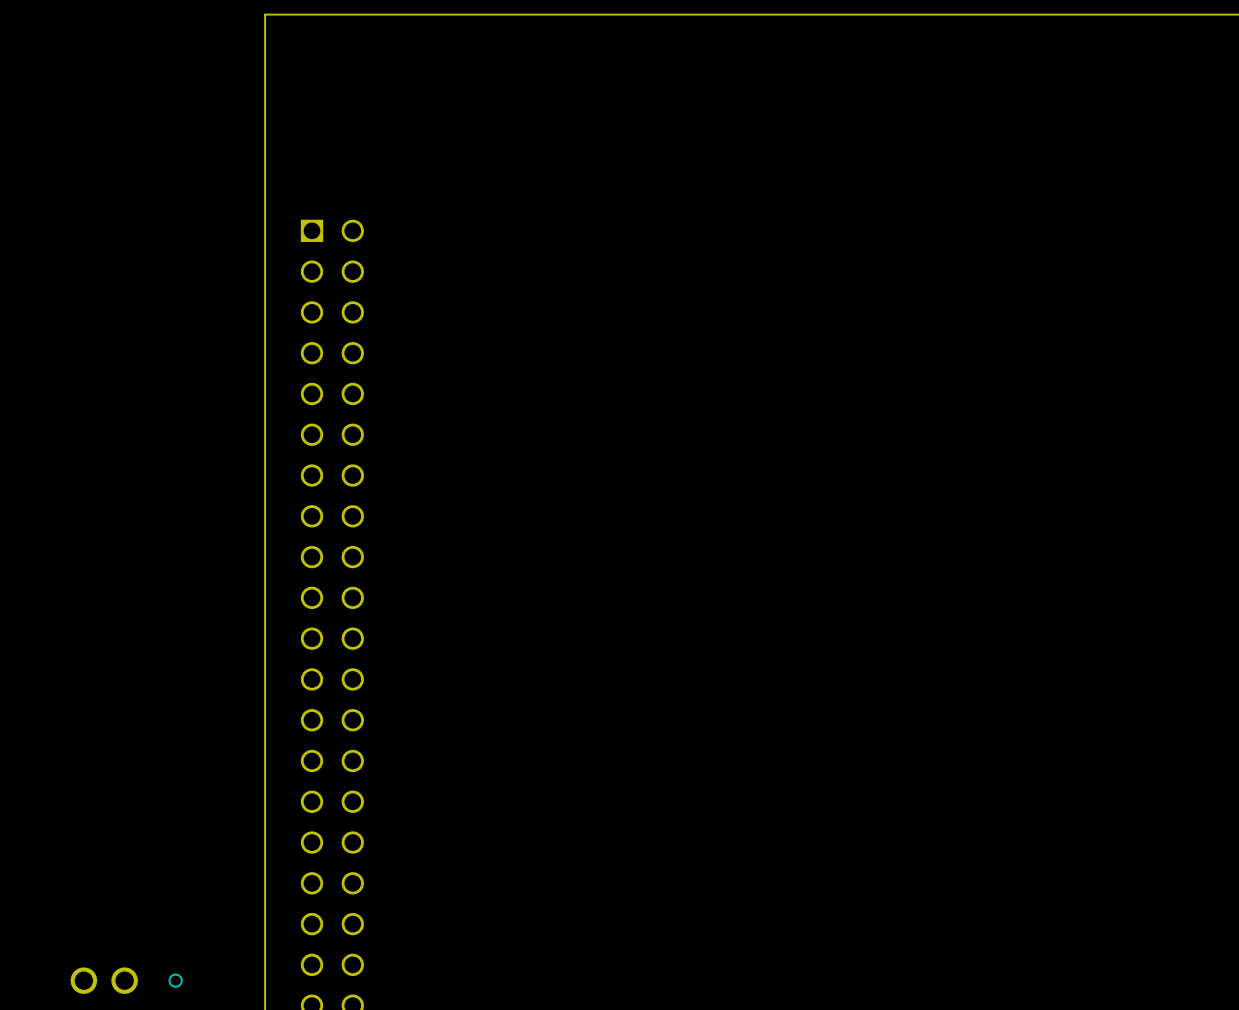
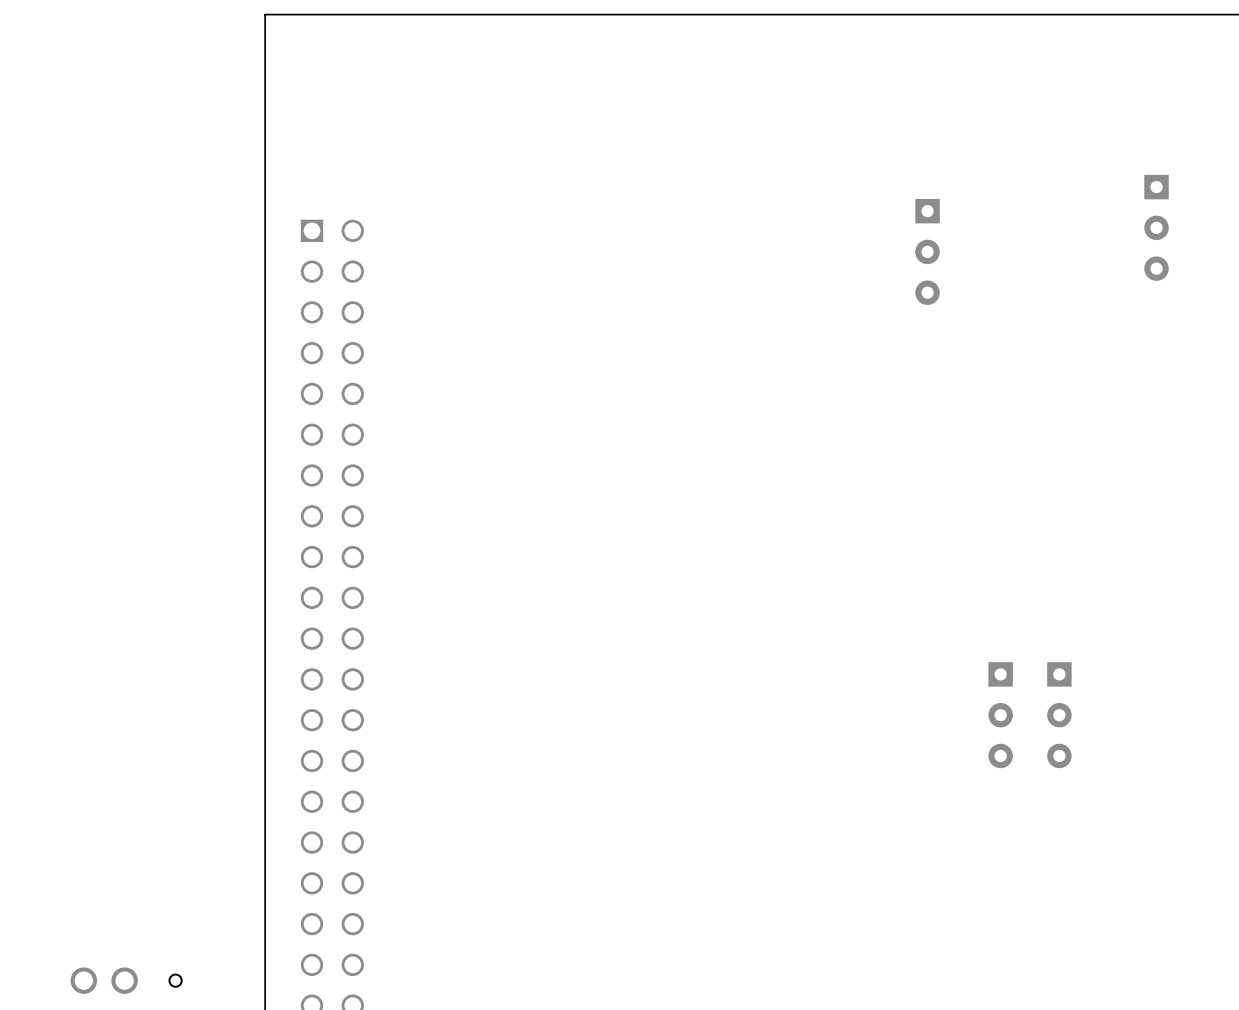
part: none -> (1156, 227)
part: none -> (927, 251)
part: none -> (1000, 715)
part: none -> (1059, 715)

